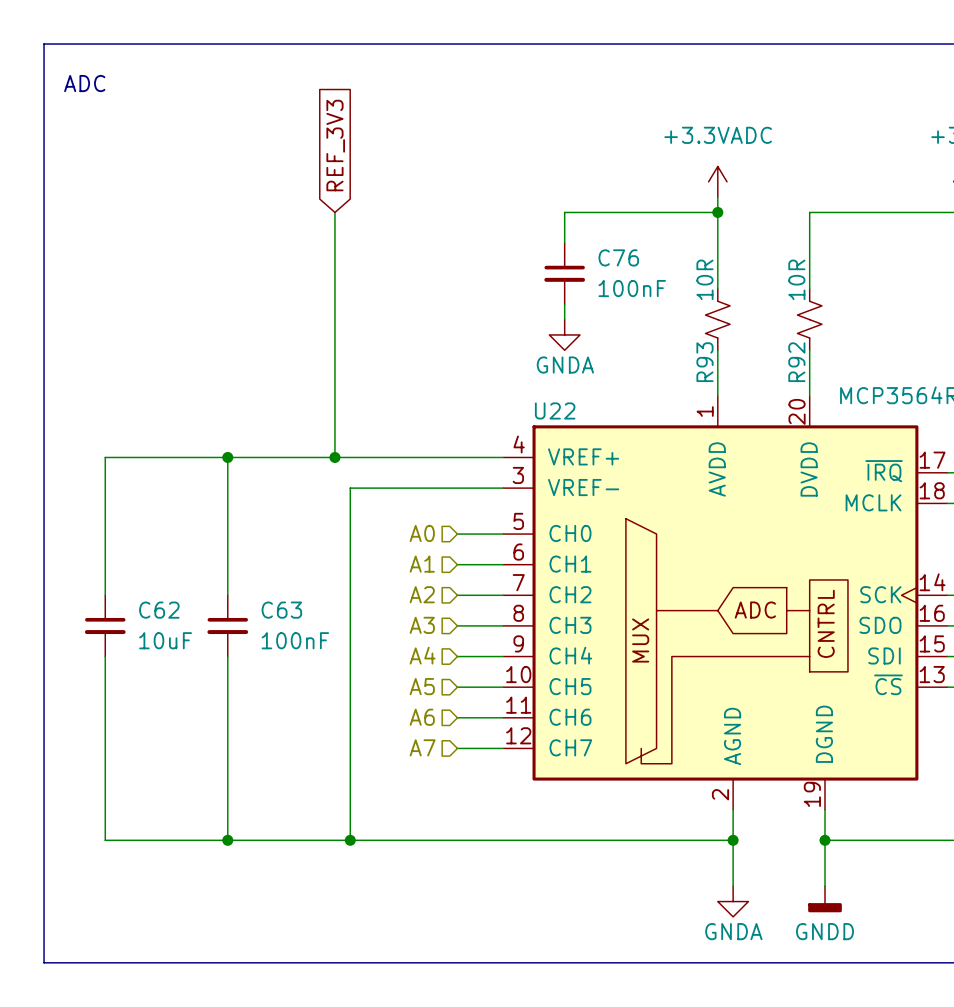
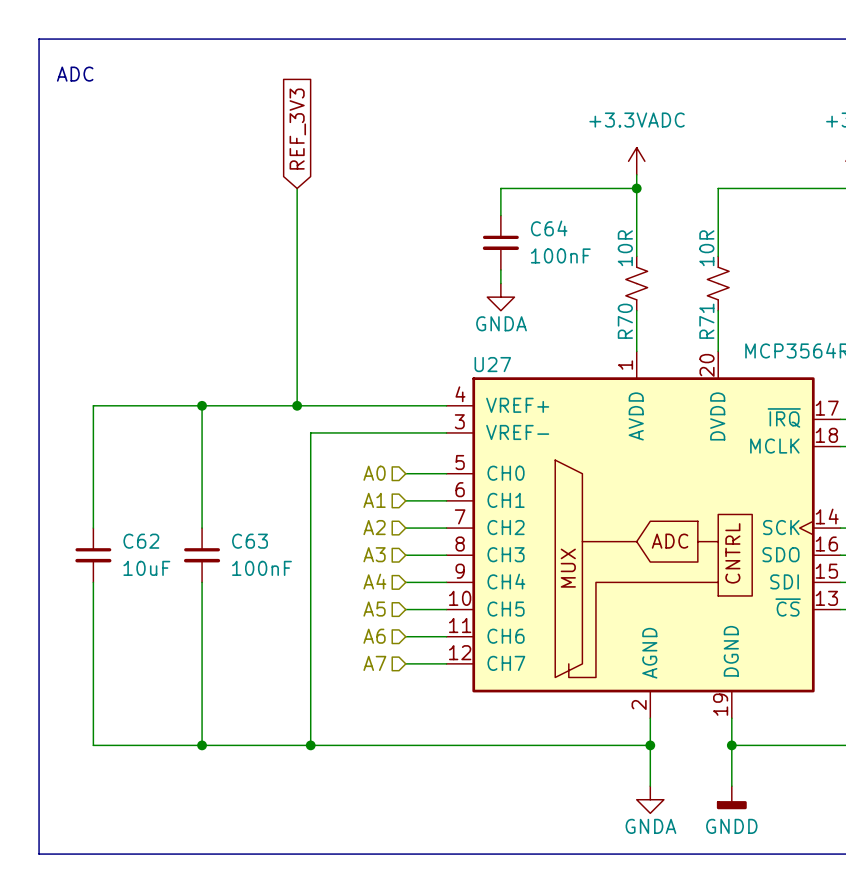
C76 name: C76 (618, 257) -> C64 (549, 228)
R93 name: R93 (704, 362) -> R70 (625, 321)
R92 name: R92 (796, 362) -> R71 (706, 321)
U22 name: U22 (555, 410) -> U27 (492, 364)

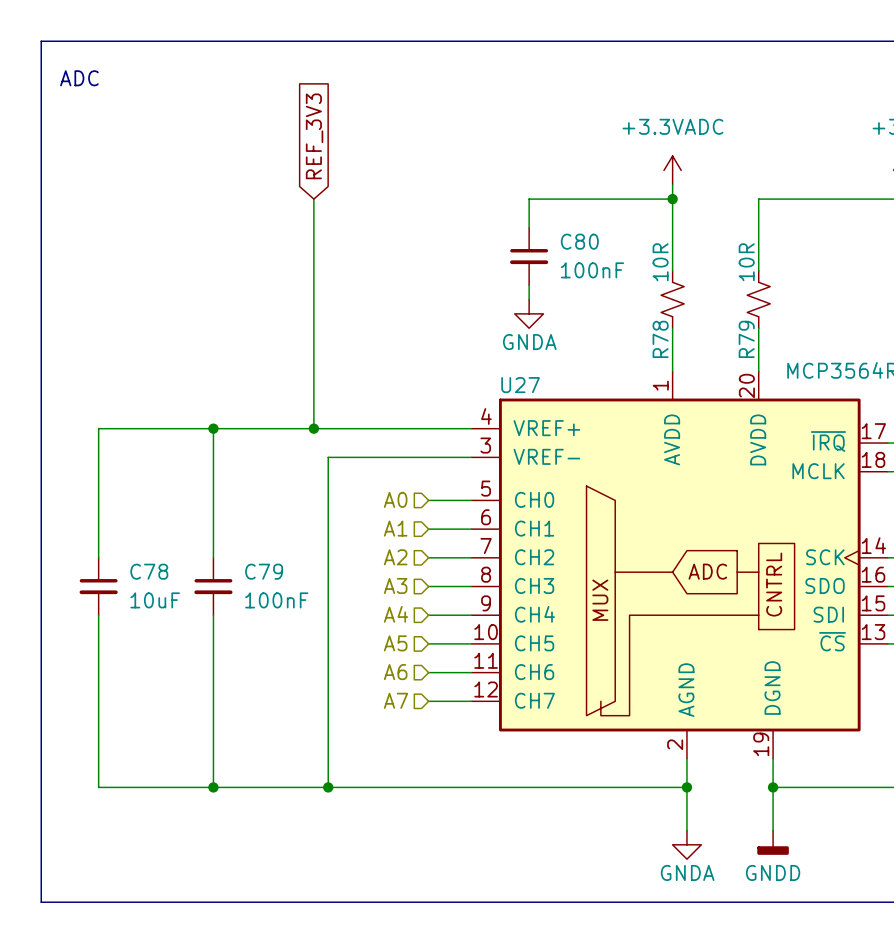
C64 name: C64 (549, 228) -> C80 (579, 241)
R70 name: R70 (625, 321) -> R78 (660, 339)
R71 name: R71 (706, 321) -> R79 (746, 339)
C62 name: C62 (141, 541) -> C78 (149, 571)
C63 name: C63 (250, 541) -> C79 (264, 571)

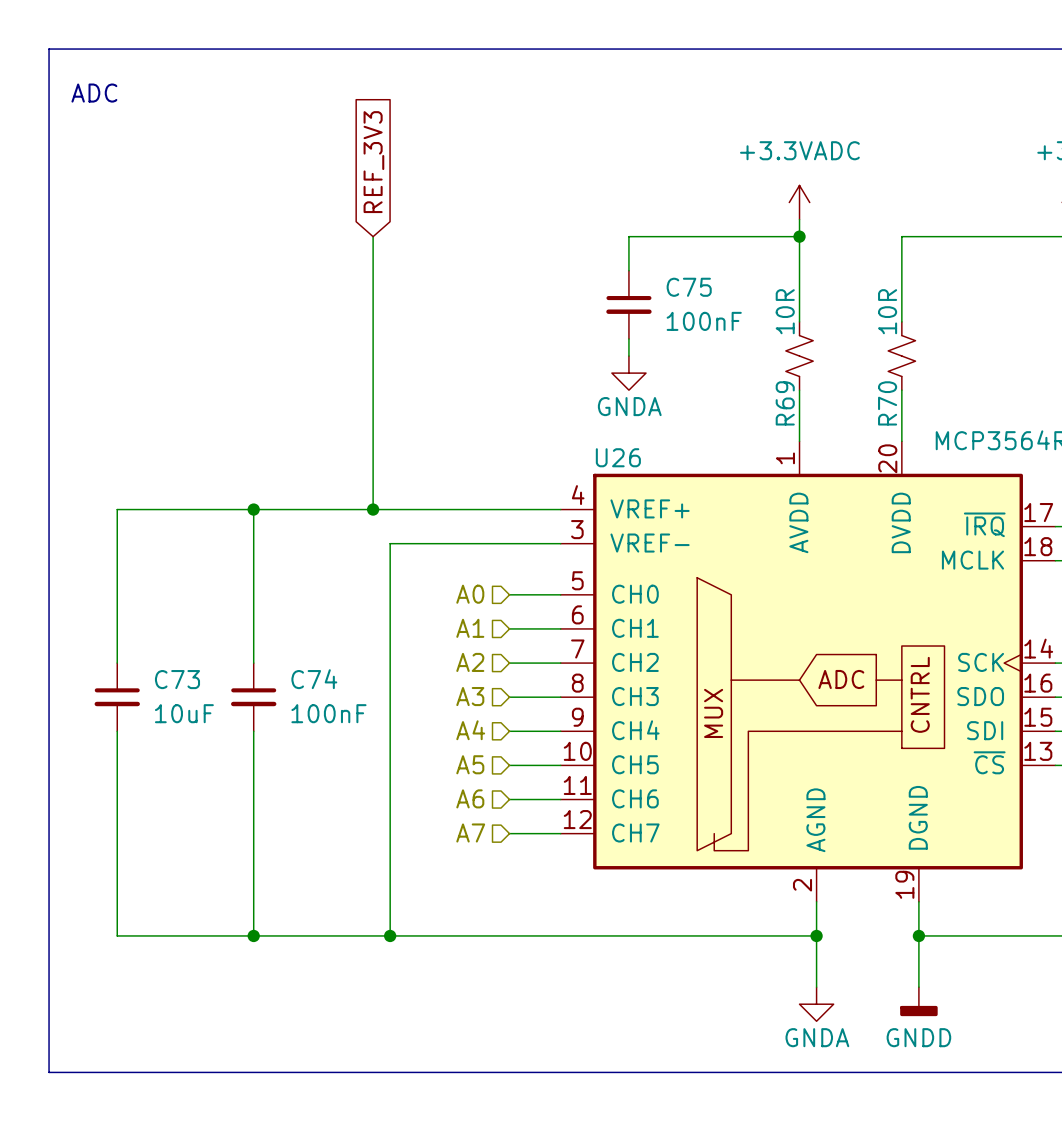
C80 name: C80 (579, 241) -> C75 (689, 287)
R78 name: R78 (660, 339) -> R69 (785, 403)
R79 name: R79 (746, 339) -> R70 (887, 403)
U27 name: U27 (520, 385) -> U26 (618, 457)
C78 name: C78 (149, 571) -> C73 (177, 679)
C79 name: C79 (264, 571) -> C74 (314, 679)

